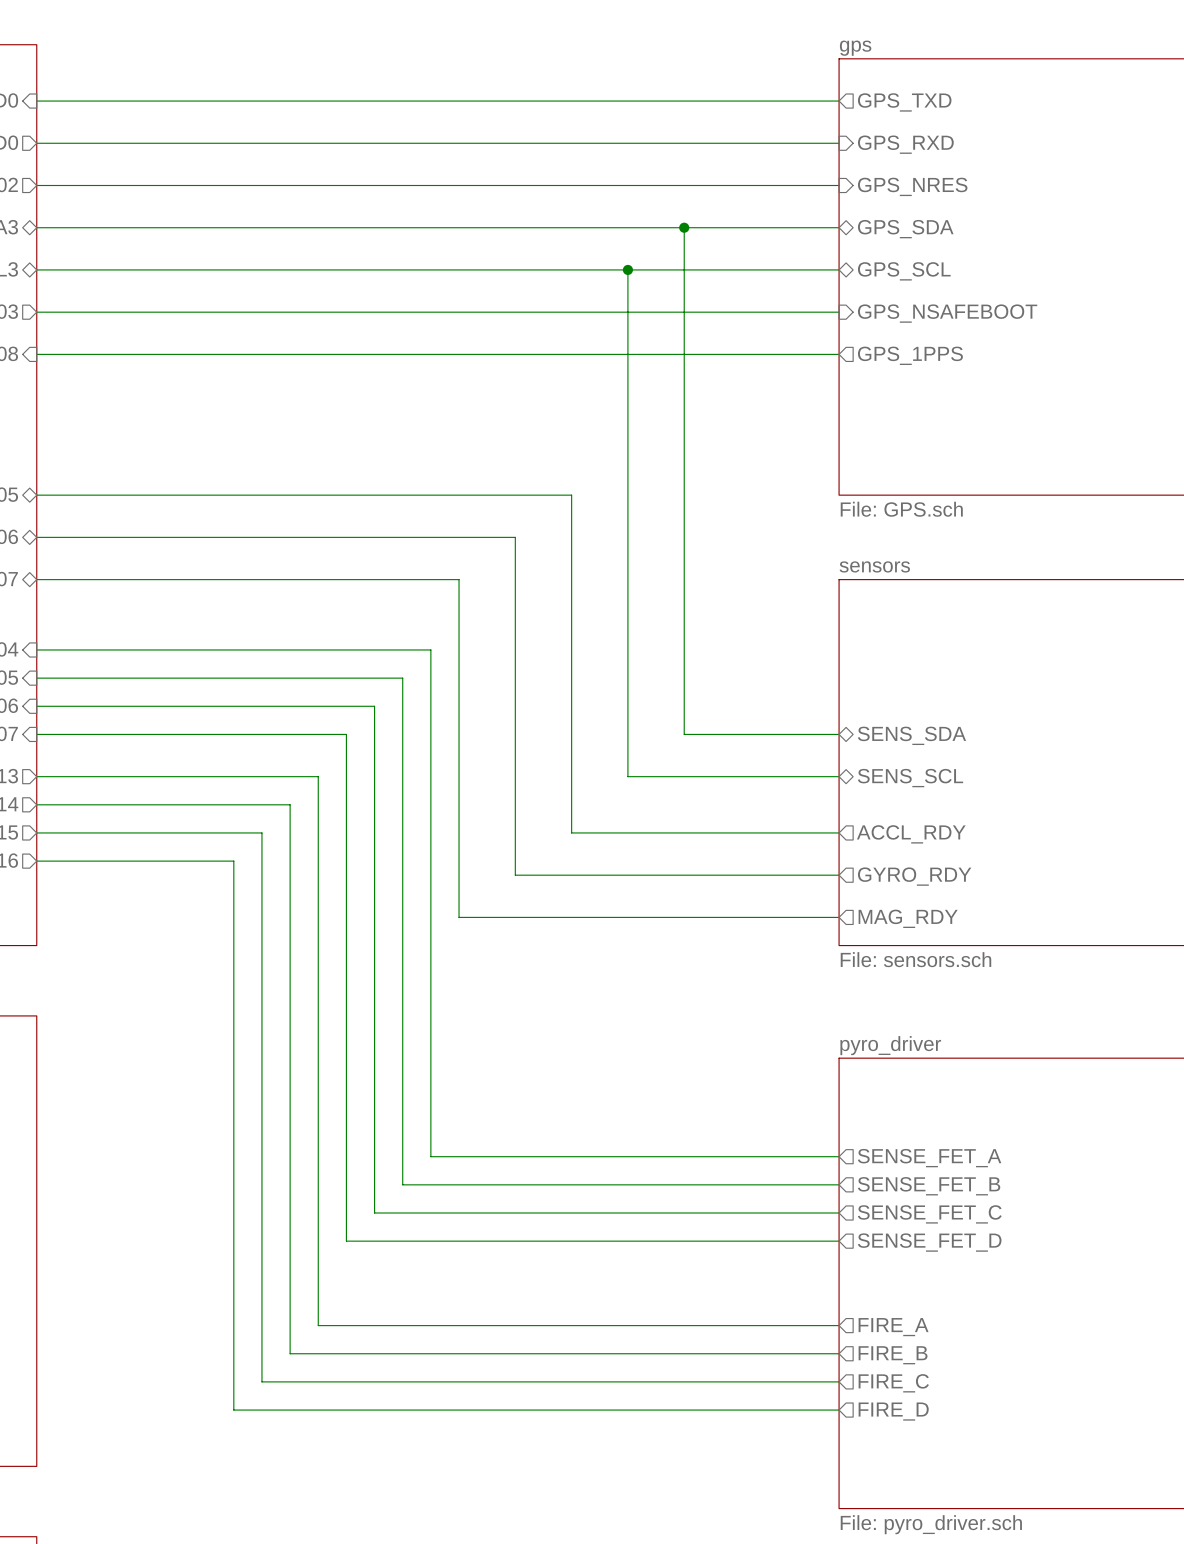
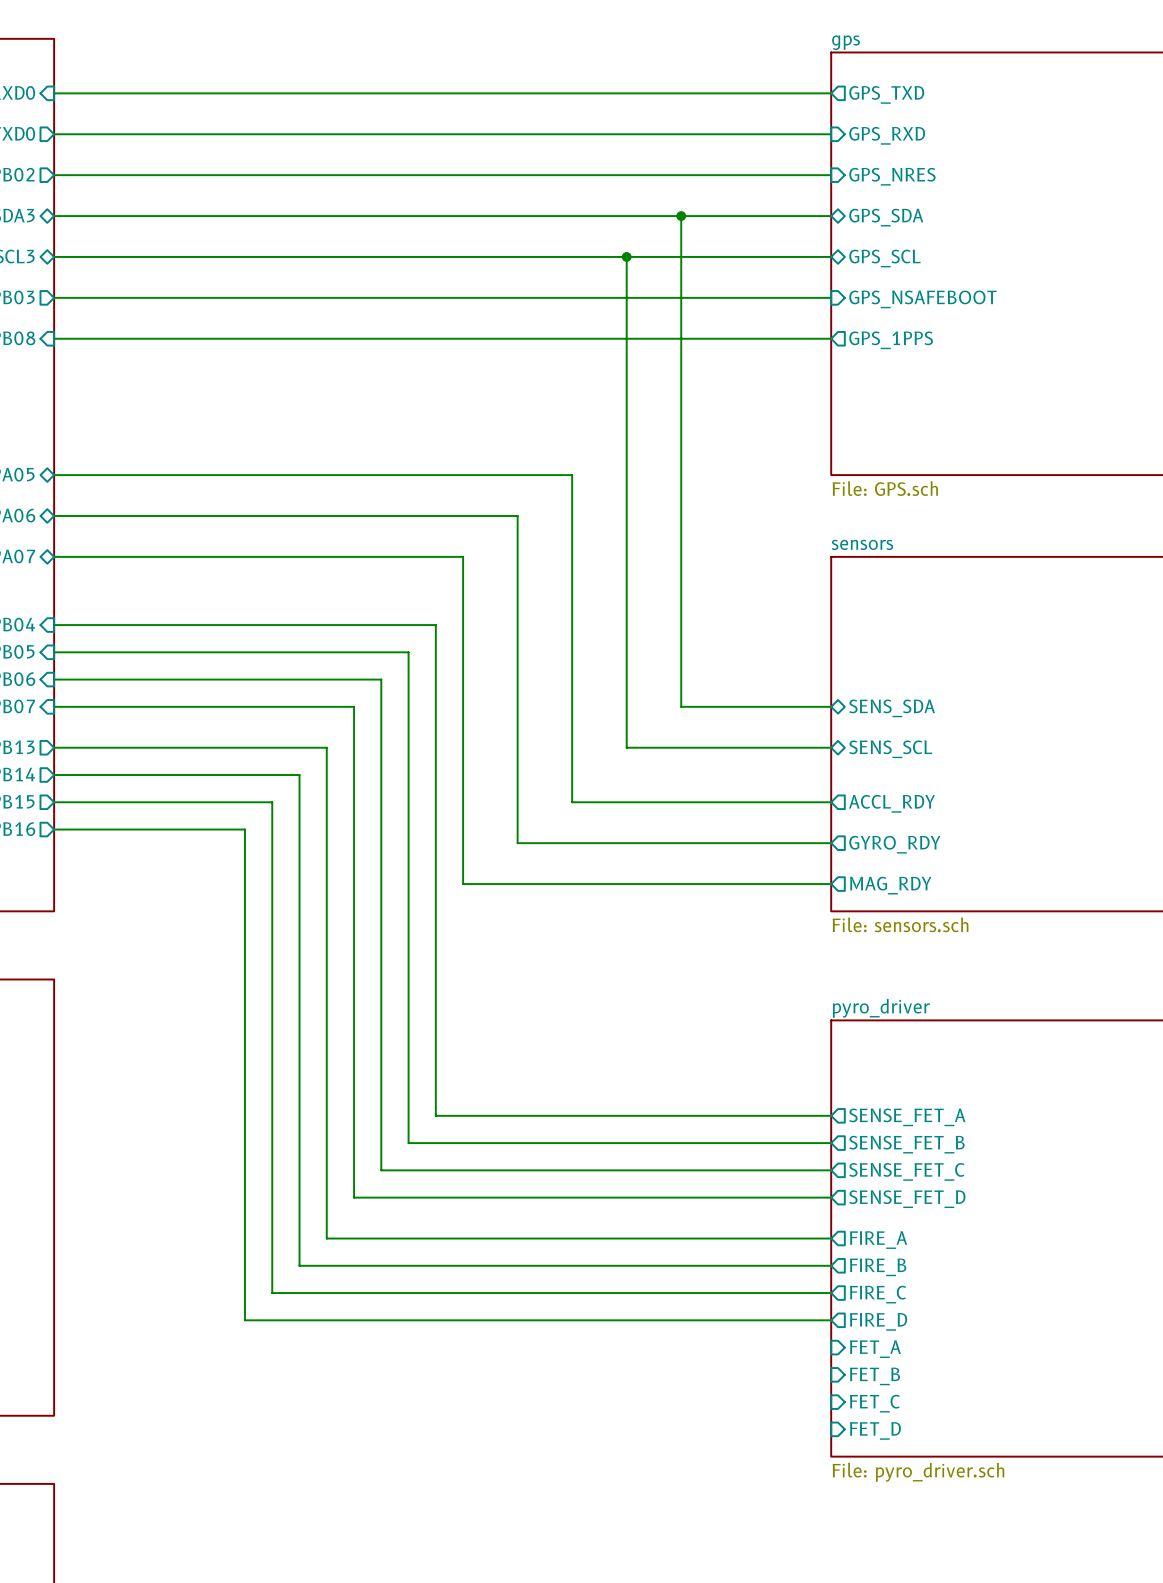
wire: (318, 1283) (318, 1325) (839, 1325) -> (326, 1238) (831, 1238)
wire: (290, 1311) (290, 1353) (839, 1353) -> (299, 1265) (831, 1265)
sheet pin position: FIRE_A (893, 1327) -> FIRE_A (878, 1240)
wire: (261, 1339) (261, 1381) (839, 1381) -> (272, 1293) (831, 1293)
sheet pin position: FIRE_B (893, 1355) -> FIRE_B (878, 1267)
wire: (233, 1367) (233, 1410) (839, 1410) -> (244, 1320) (831, 1320)
sheet pin position: FIRE_C (893, 1383) -> FIRE_C (878, 1294)
sheet pin: none -> FET_A (875, 1349)
sheet pin position: FIRE_D (893, 1411) -> FIRE_D (878, 1321)
sheet pin: none -> FET_B (874, 1376)
sheet pin: none -> FET_C (874, 1403)
sheet pin: none -> FET_D (875, 1430)

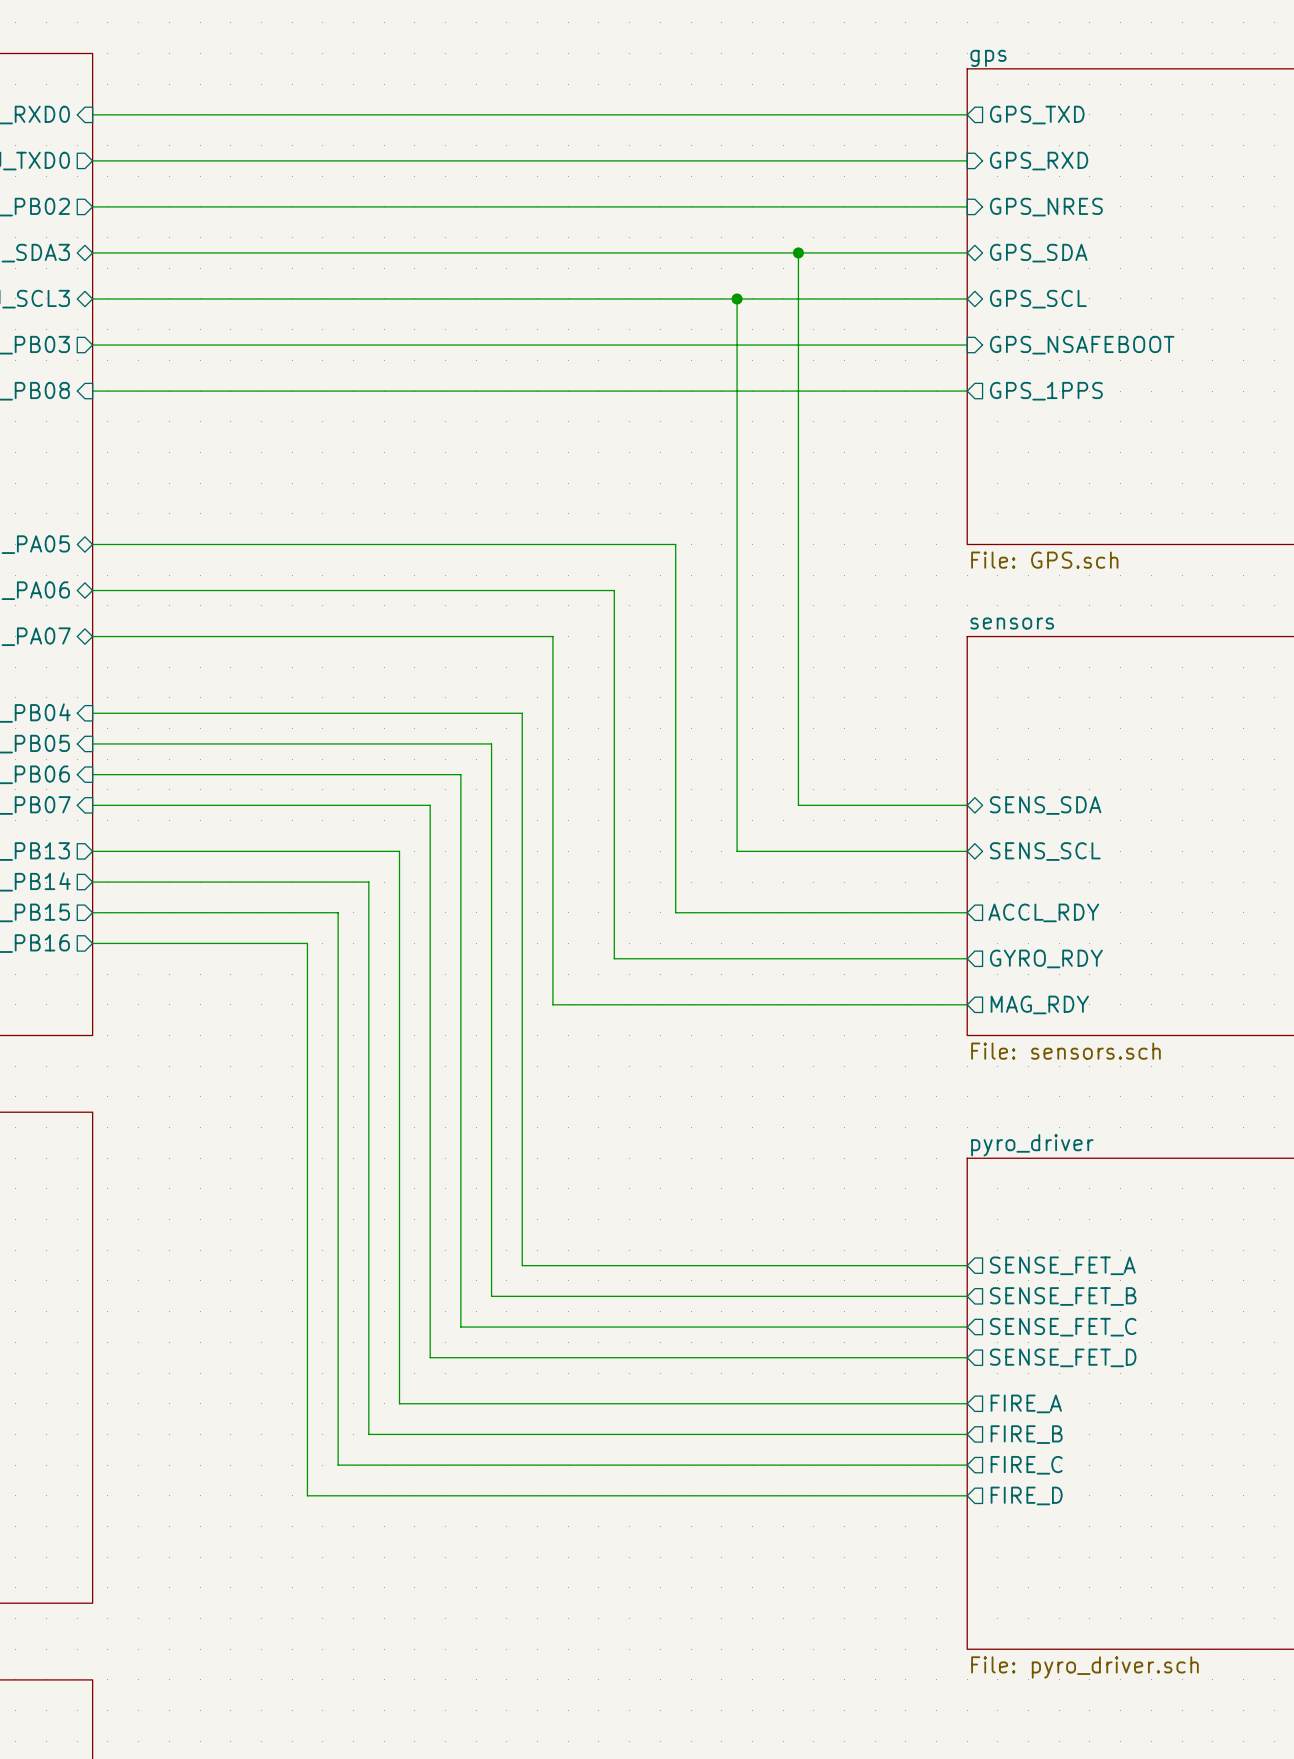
sheet pin: FET_A (875, 1349) -> none
sheet pin: FET_B (874, 1376) -> none
sheet pin: FET_C (874, 1403) -> none
sheet pin: FET_D (875, 1430) -> none

